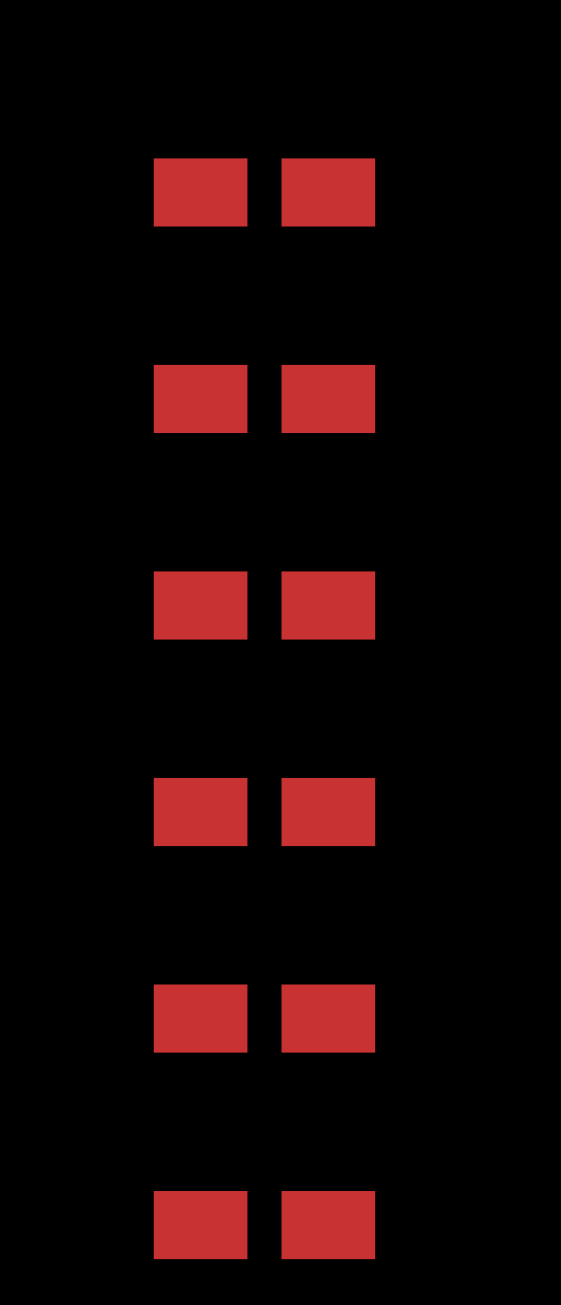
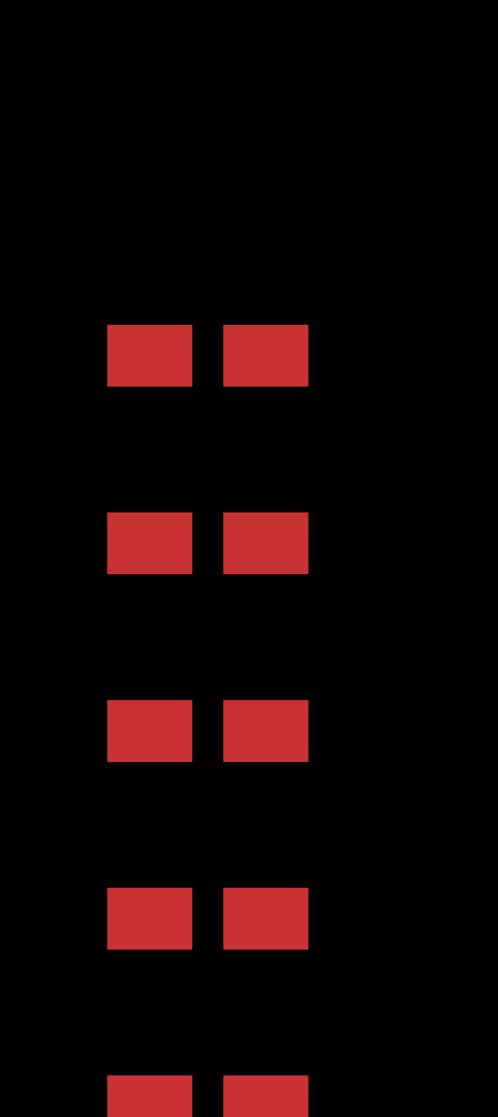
part: (264, 192) -> none

